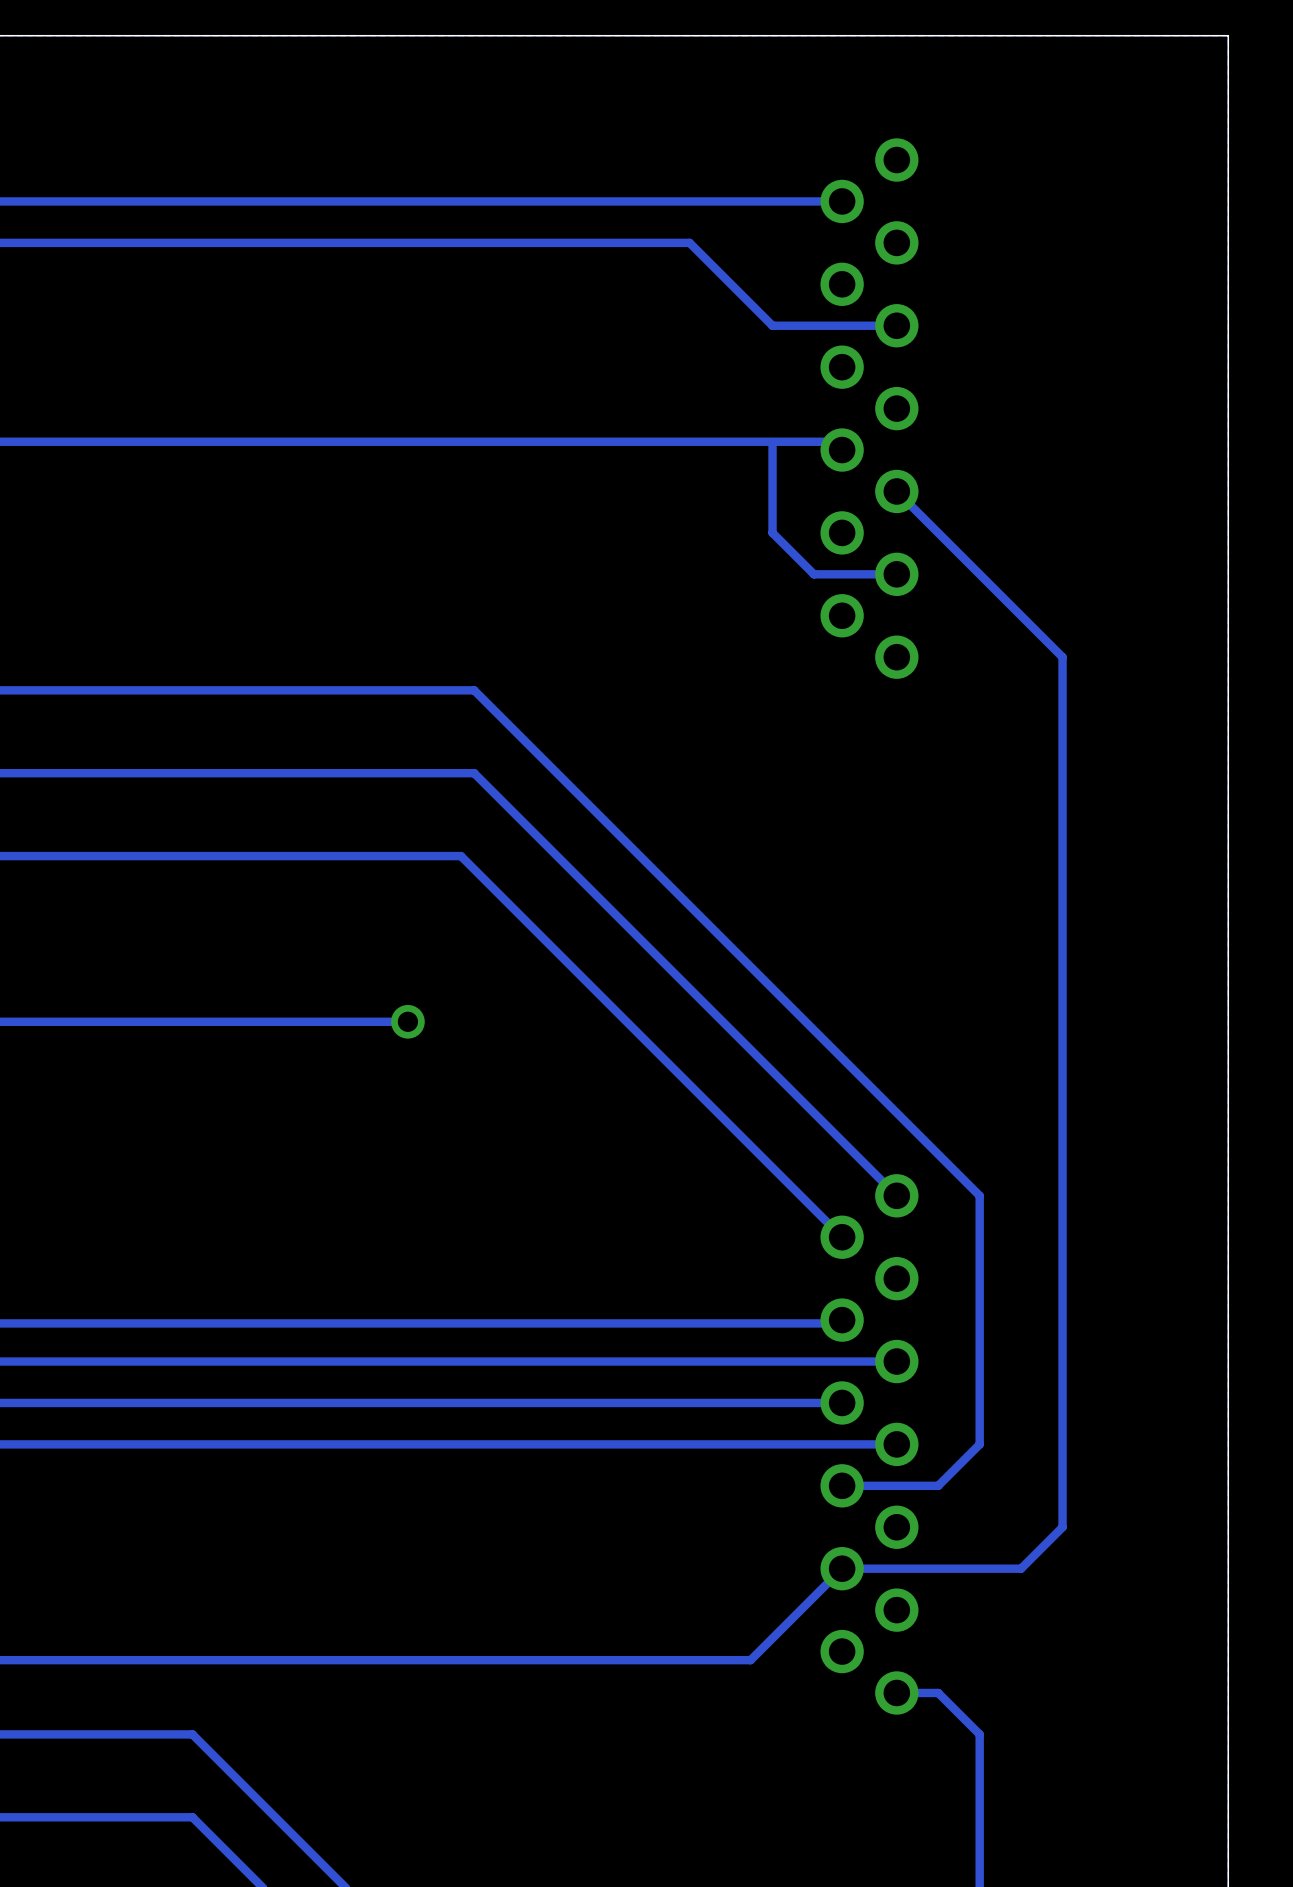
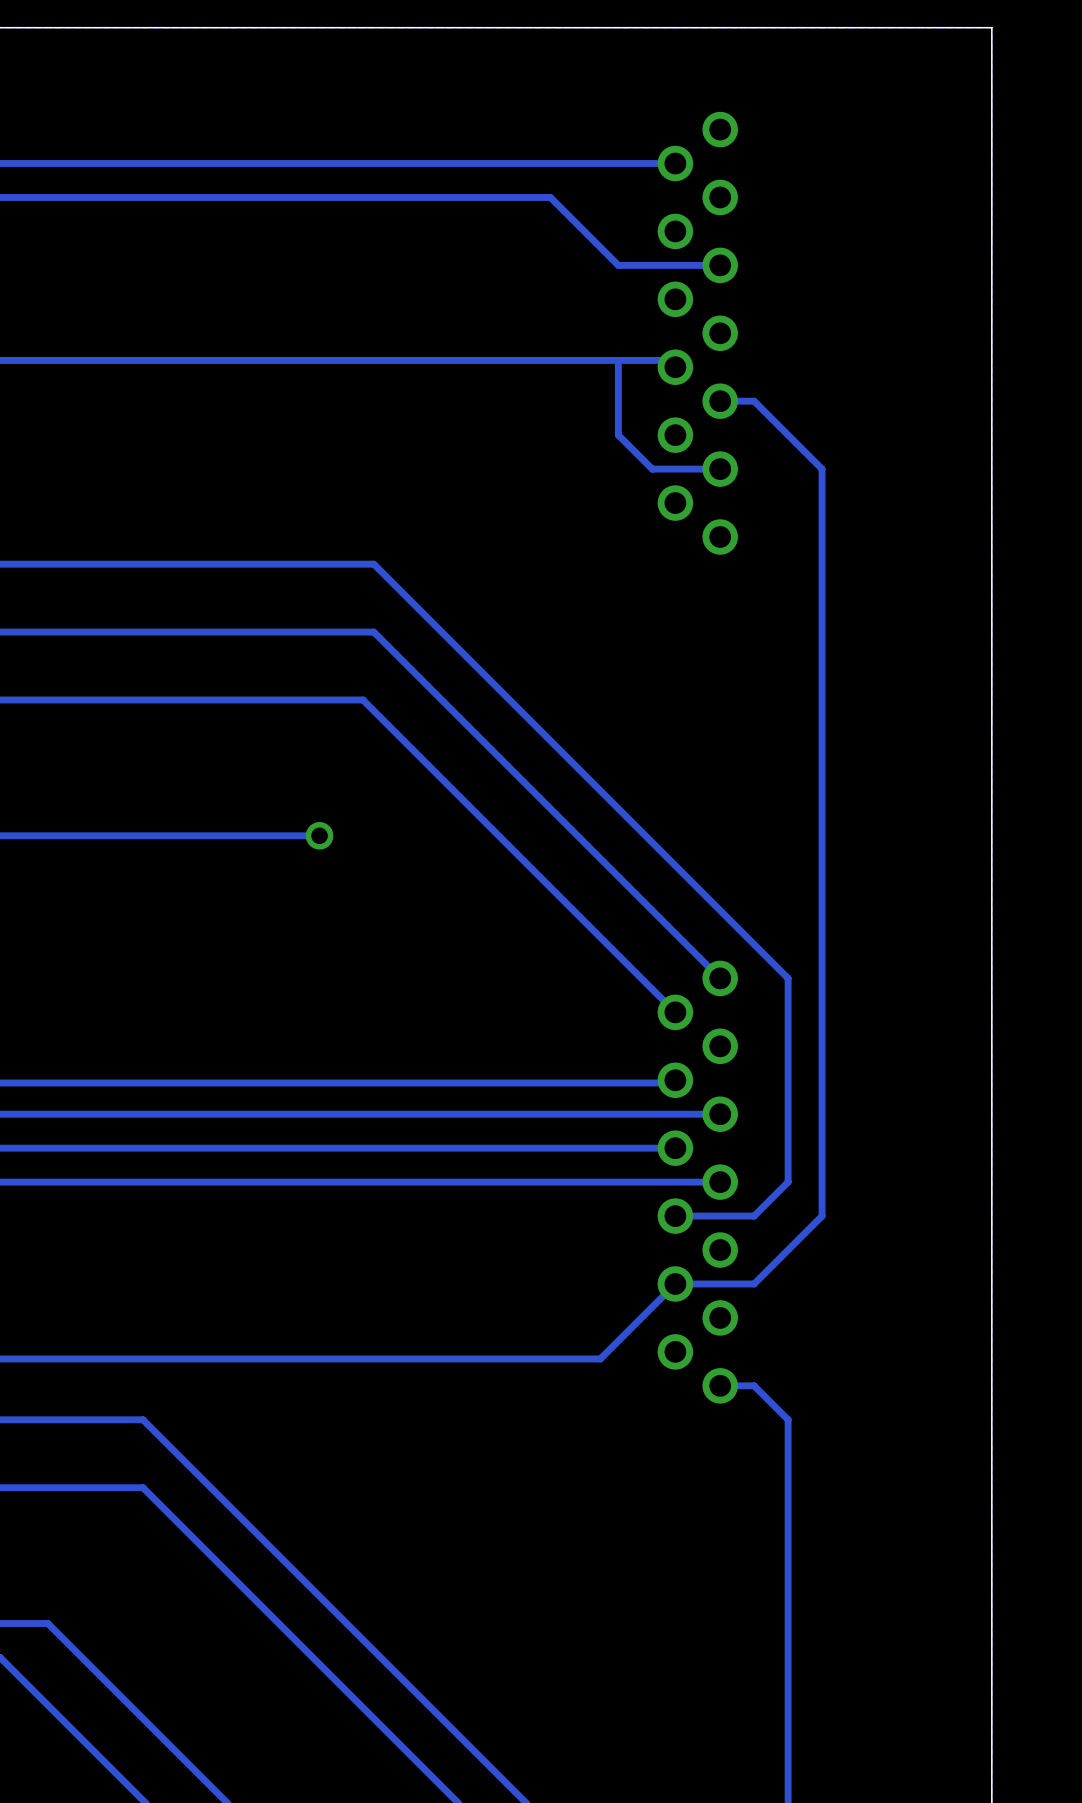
track: (896, 491) (1062, 657) (1062, 1527) (1021, 1568) (938, 1568) -> (720, 401) (754, 401) (822, 469) (822, 1216) (754, 1283)

